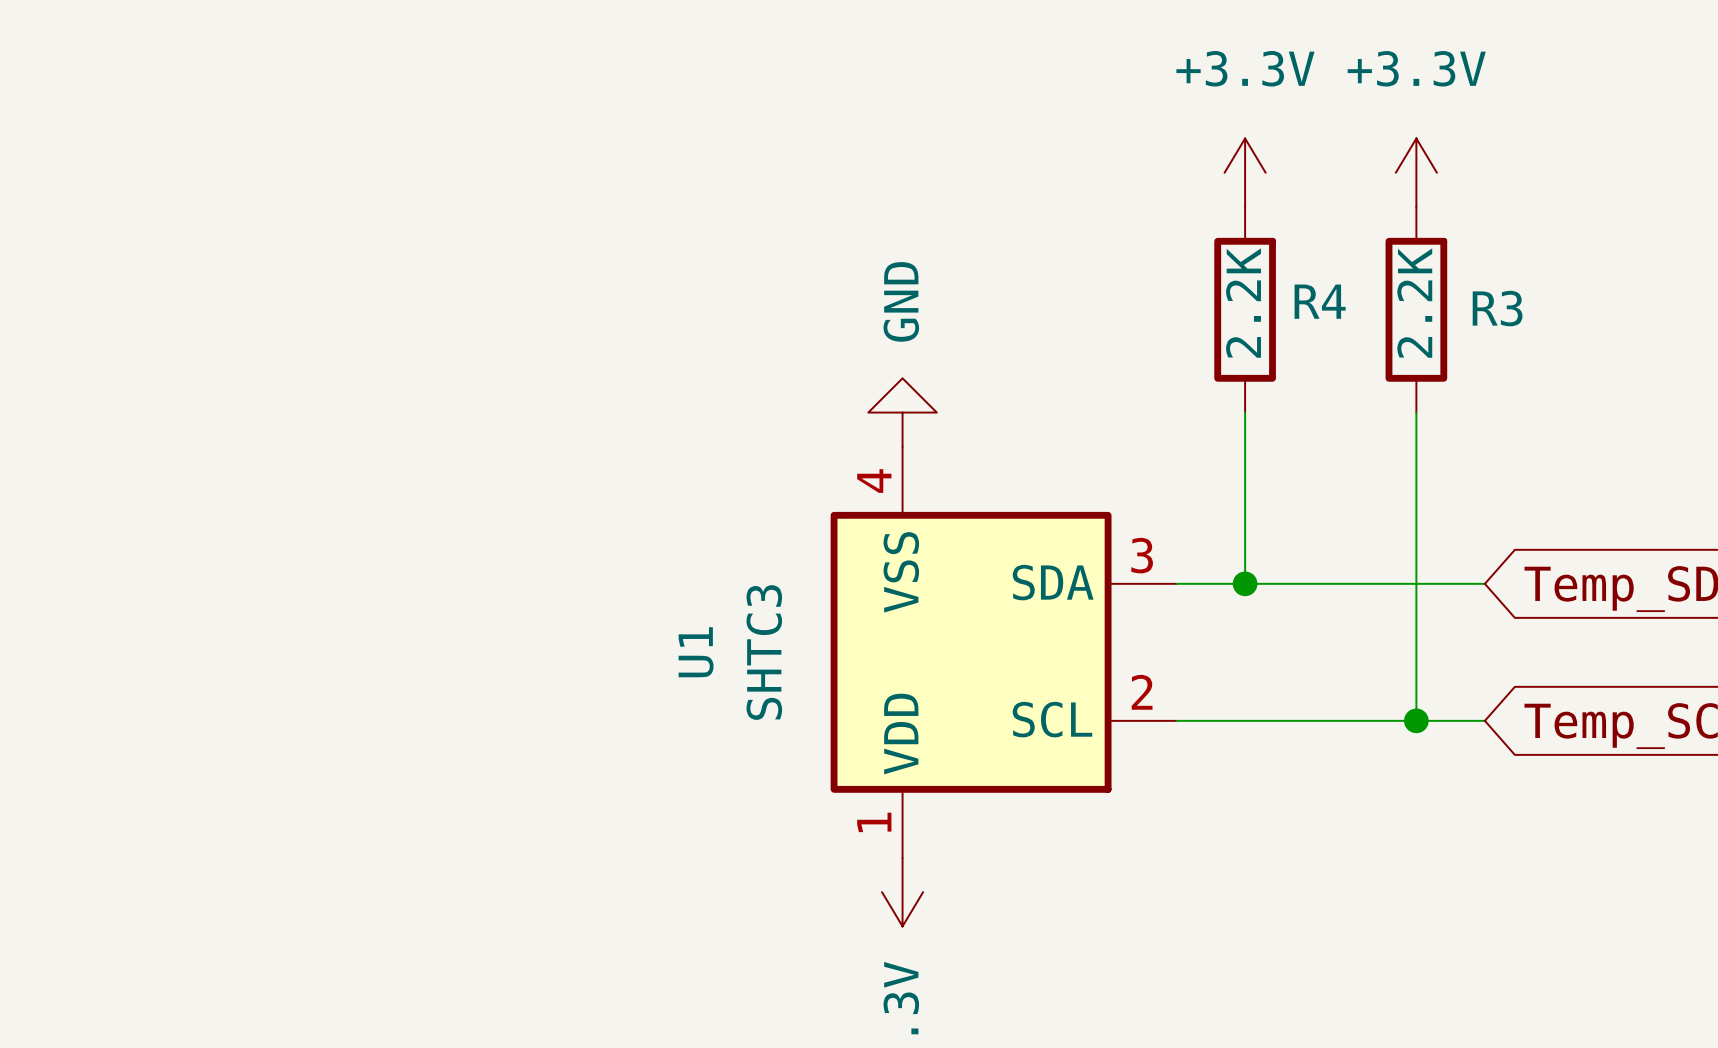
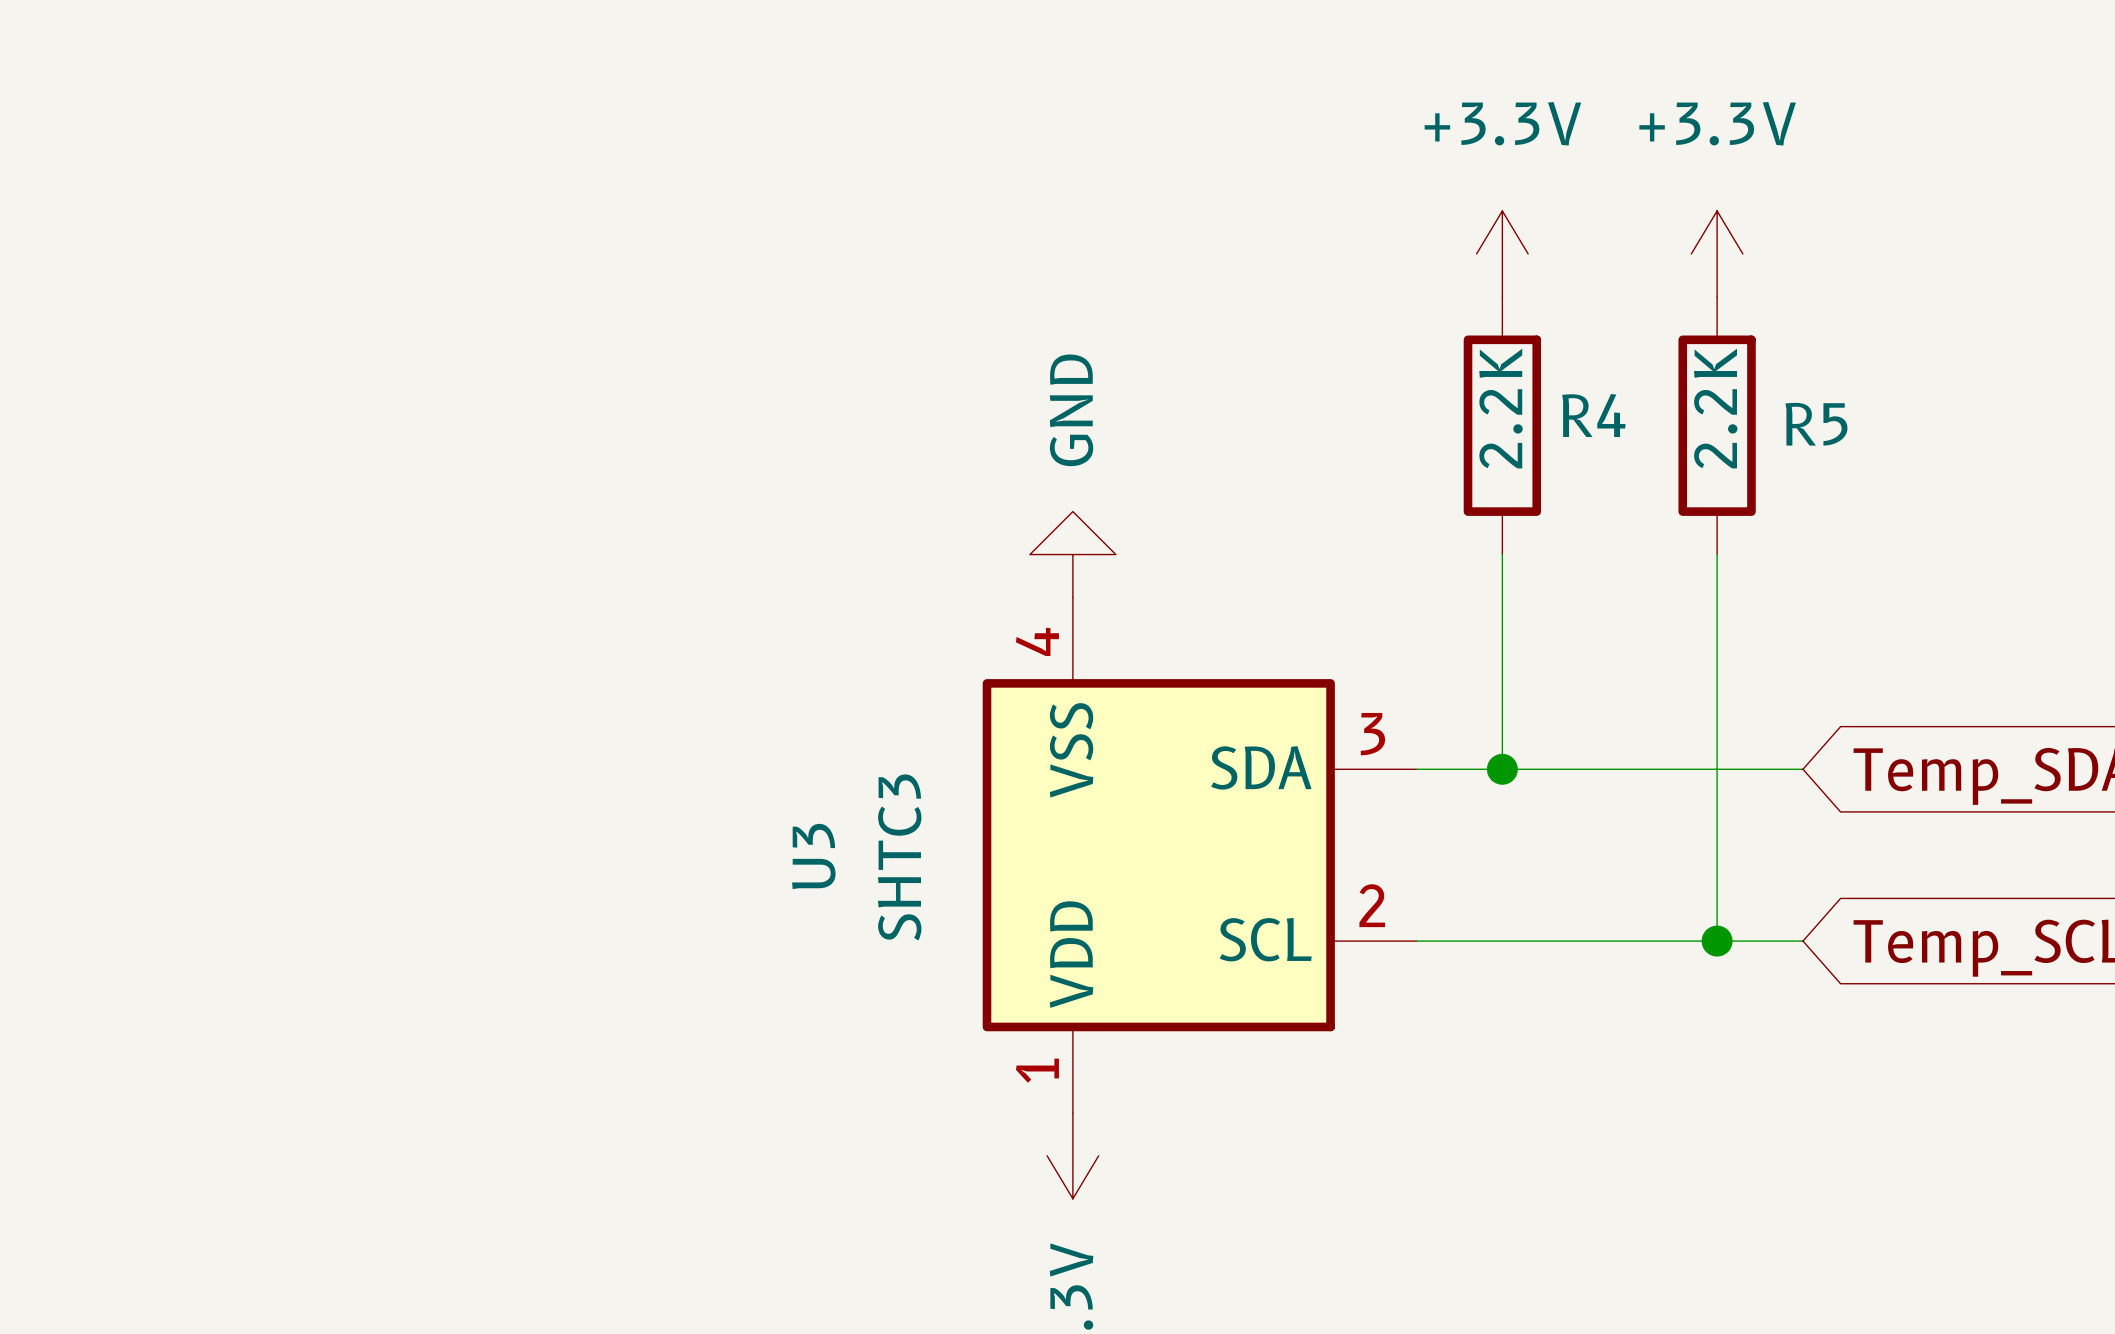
R3 name: R3 (1497, 308) -> R5 (1816, 424)
U1 name: U1 (696, 652) -> U3 (813, 856)

